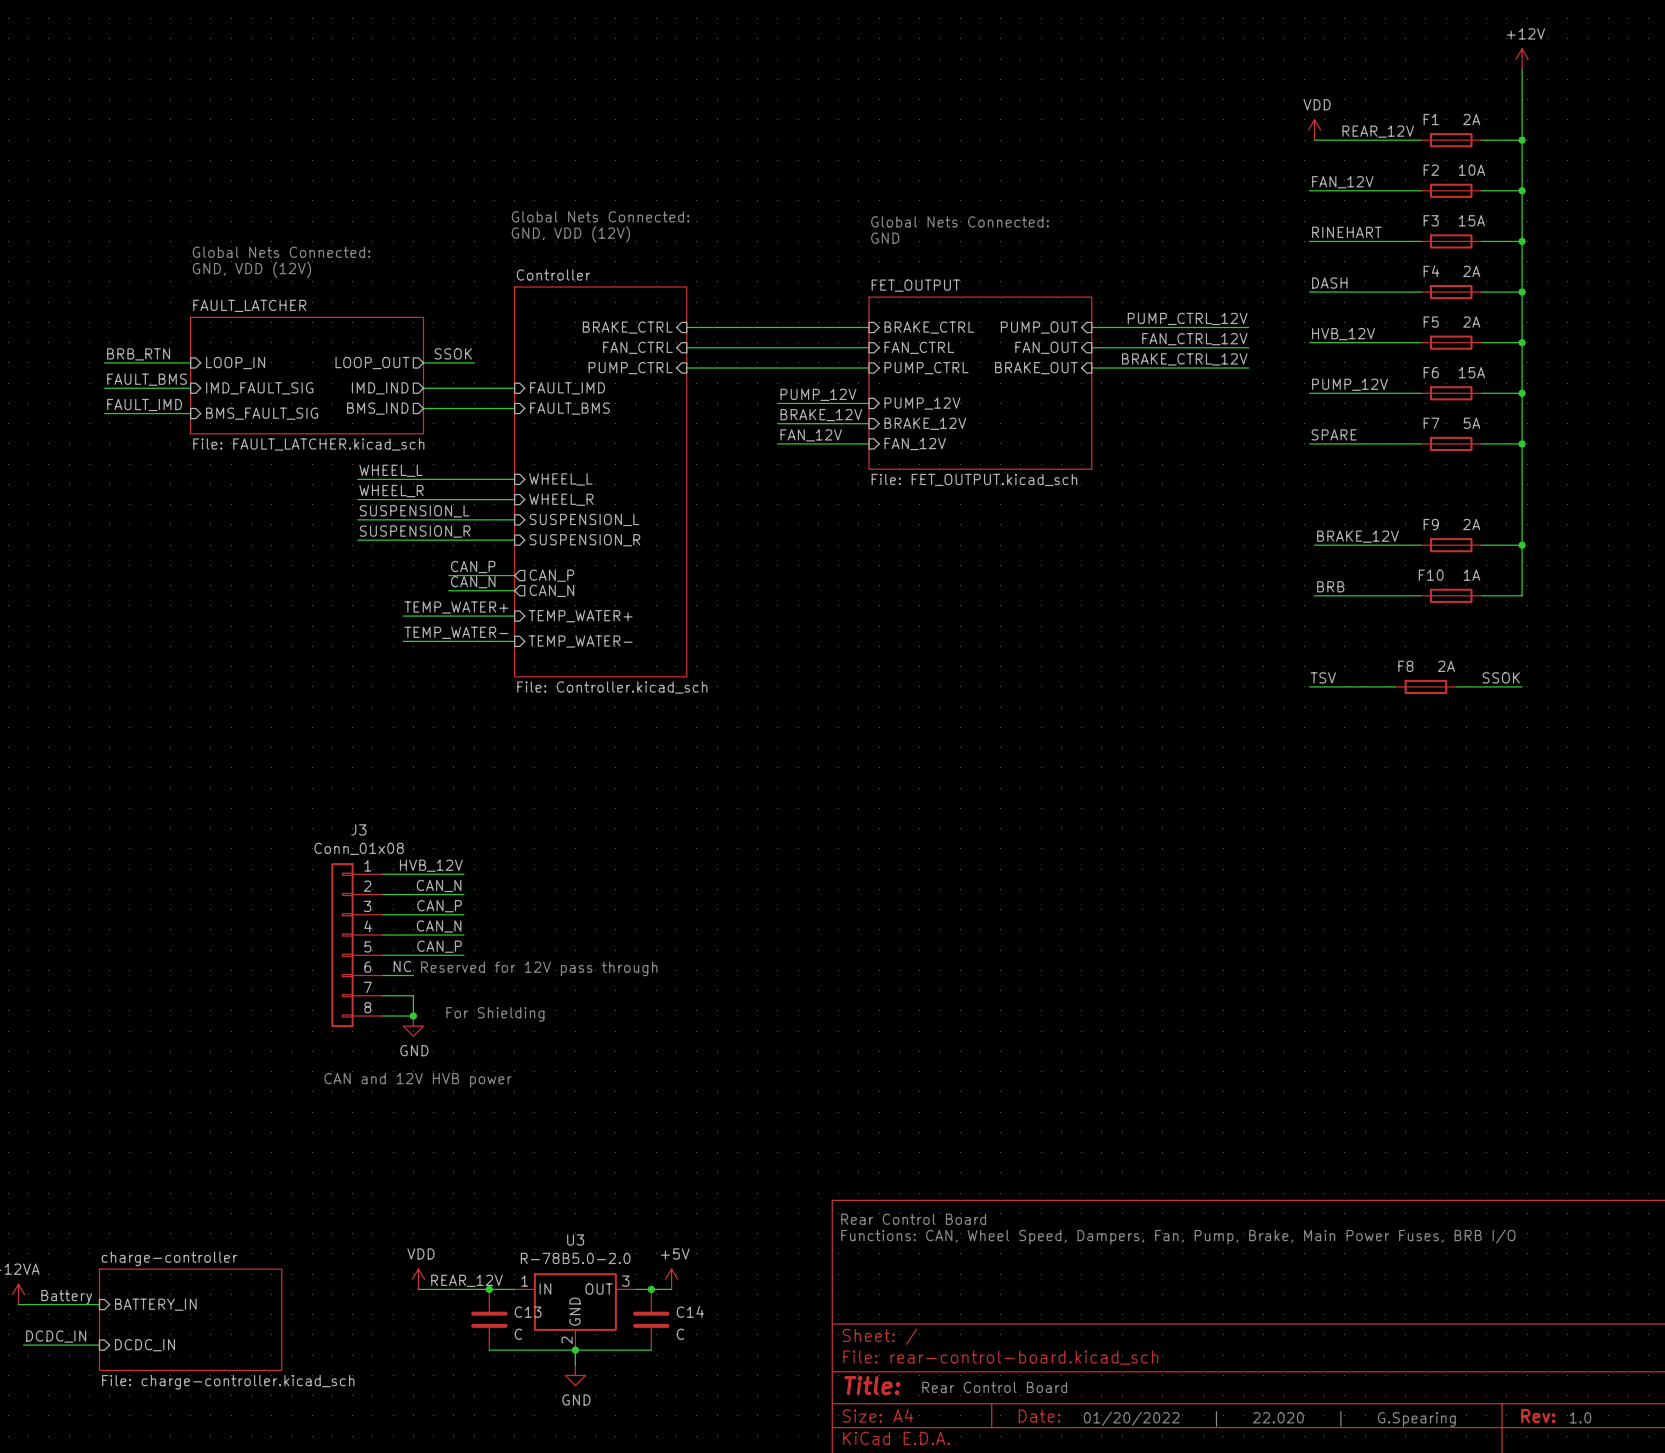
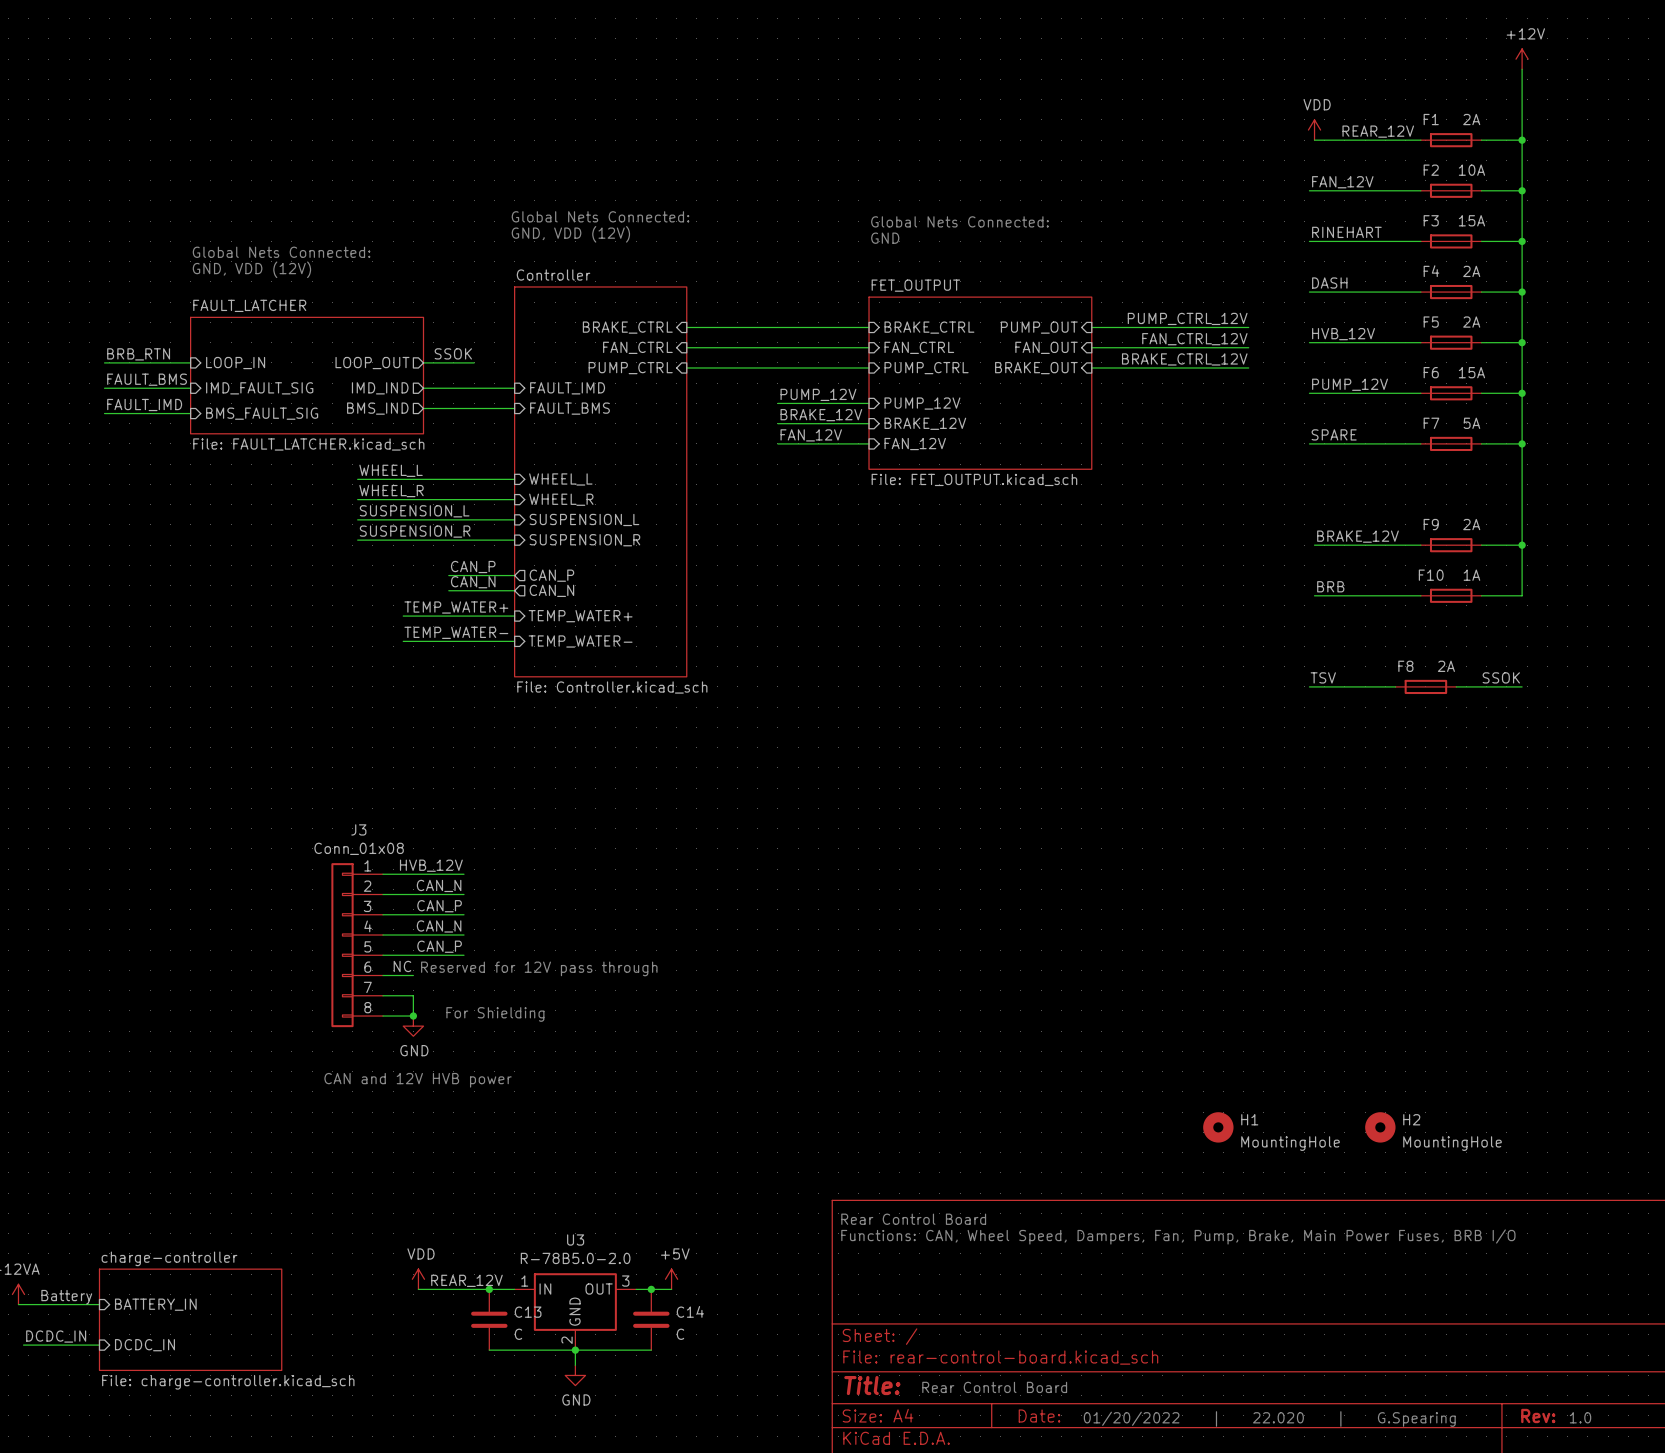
H1: none -> MountingHole (1218, 1127)
H2: none -> MountingHole (1380, 1127)

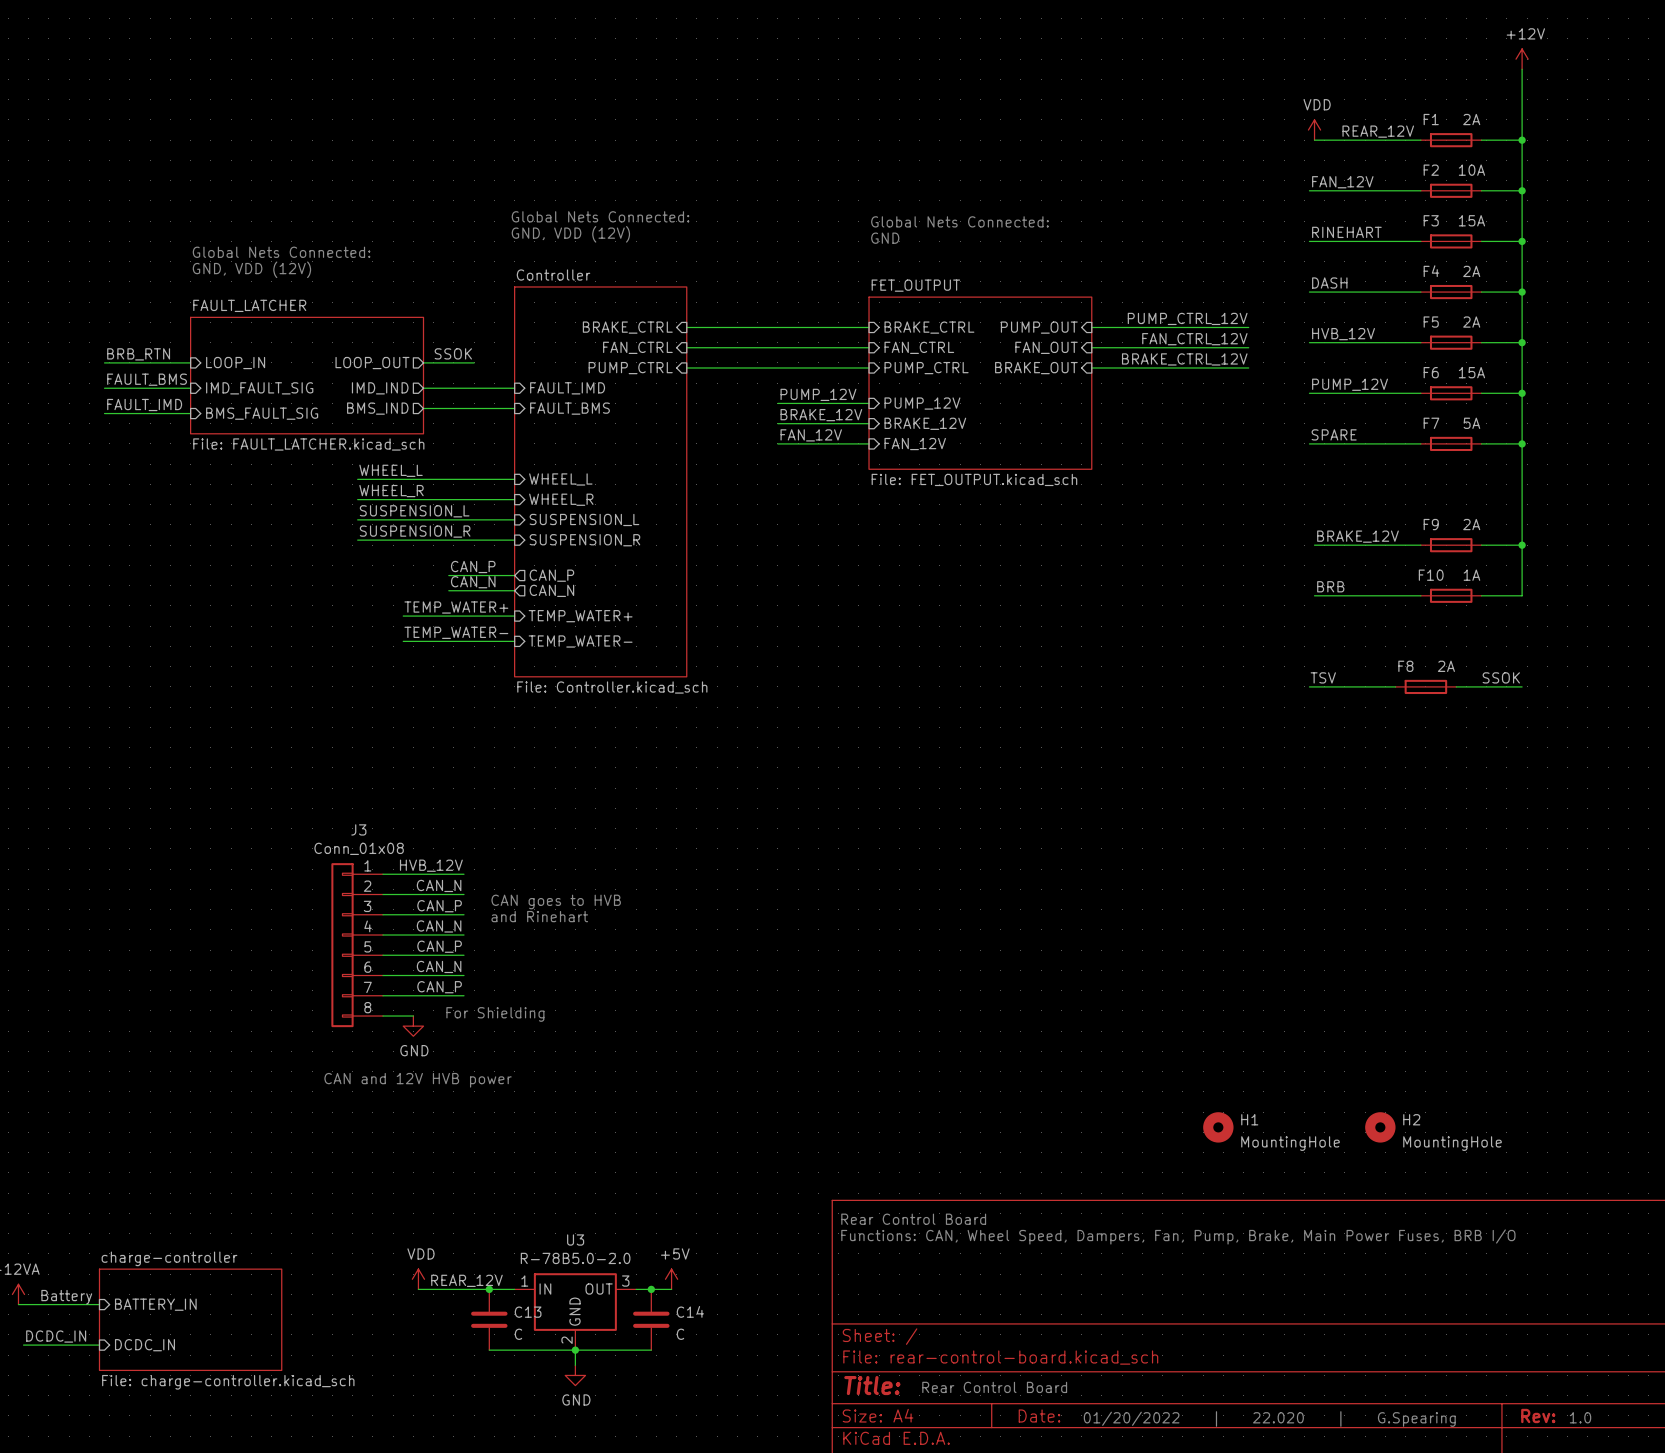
text: none -> CAN goes to HVB (556, 901)
text: none -> and Rinehart (539, 916)
label: NC (402, 966) -> none
label: none -> CAN_N (439, 966)
text: Reserved for 12V pass through (539, 968) -> none
wire: none -> (413, 975) (464, 975)
label: none -> CAN_P (439, 987)
wire: (413, 995) (413, 1016) -> (413, 995) (464, 995)
junction: (413, 1016) -> none

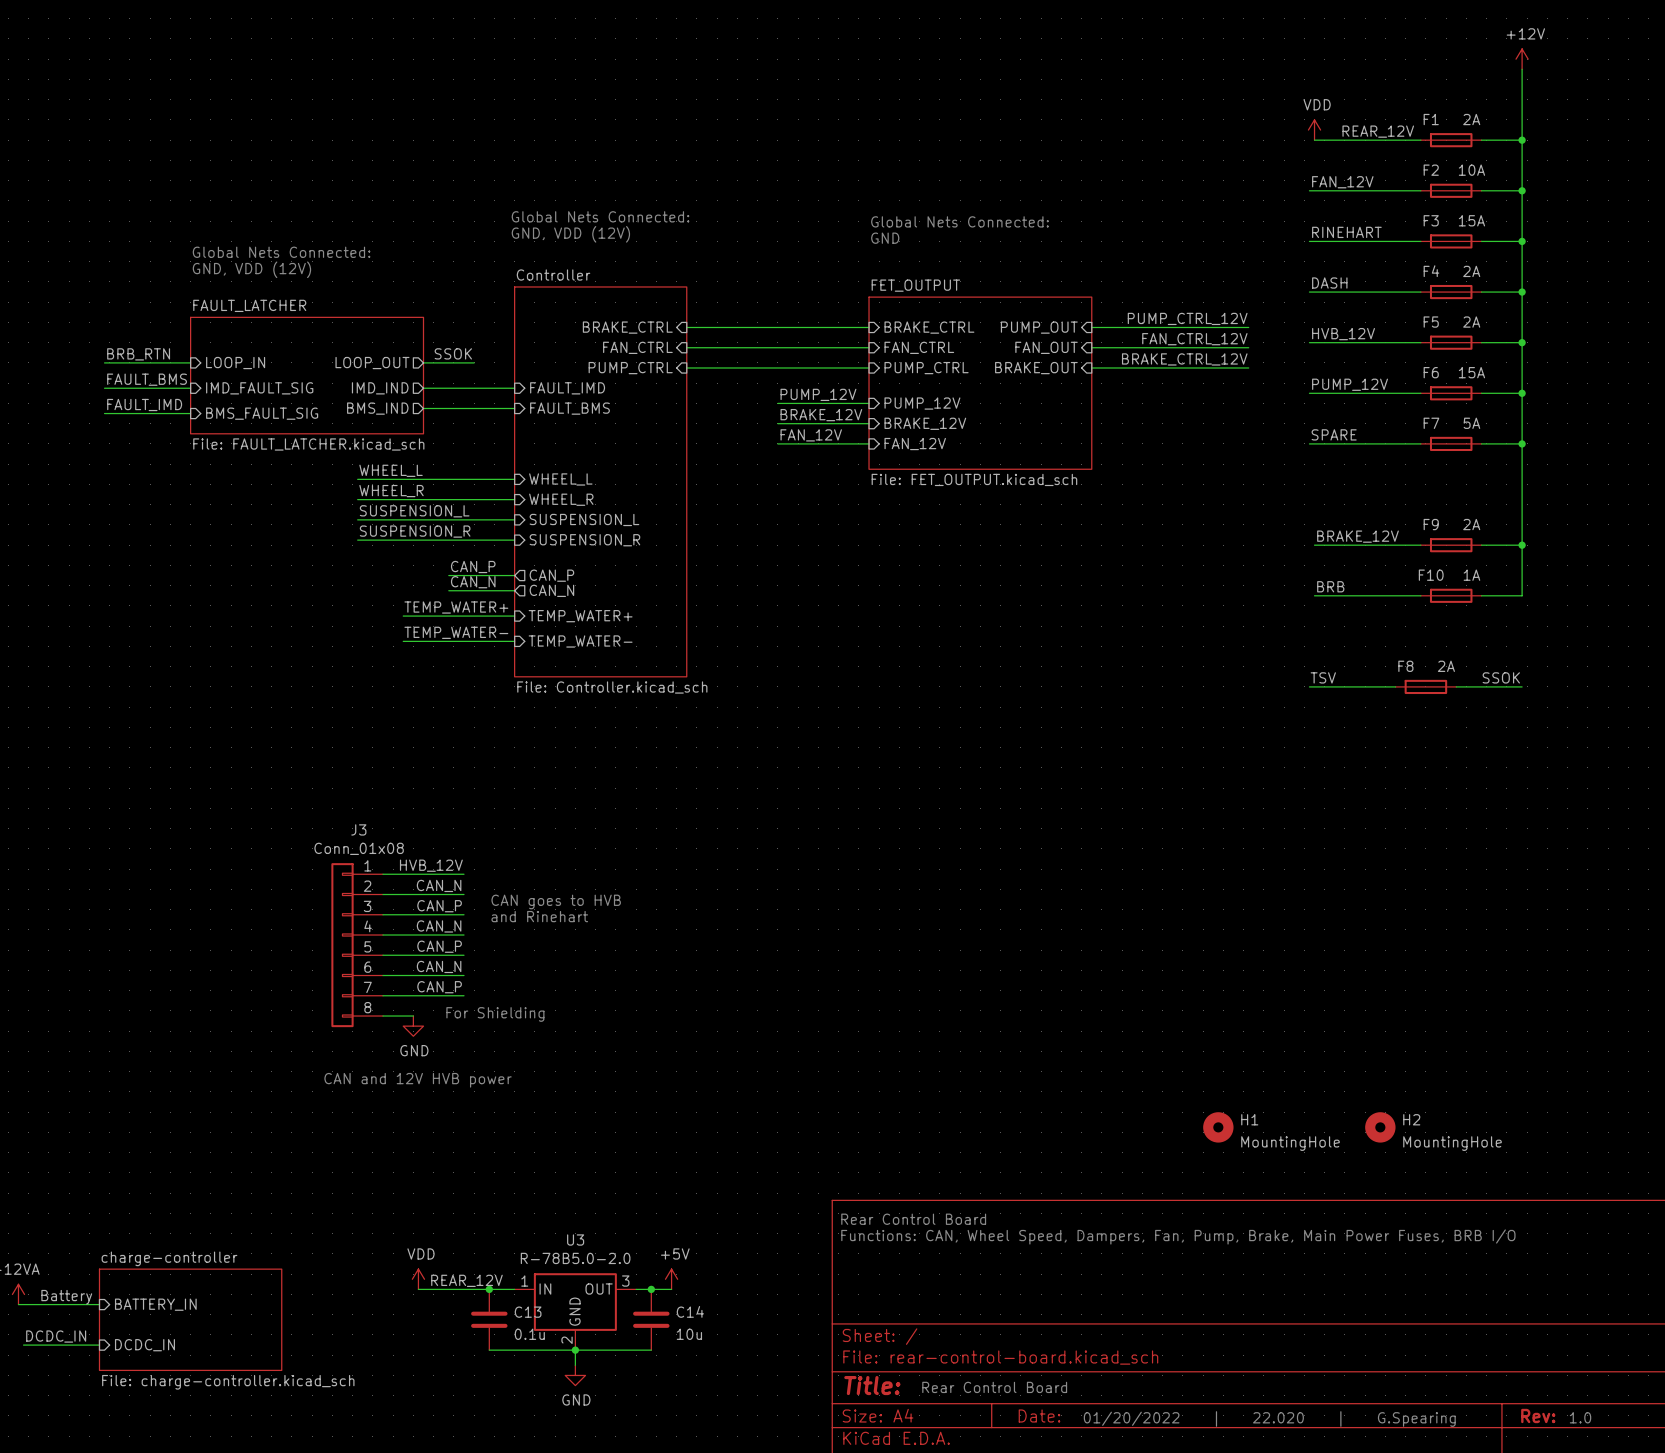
C13 value: C (518, 1334) -> 0.1u (529, 1334)
C14 value: C (680, 1334) -> 10u (689, 1334)

